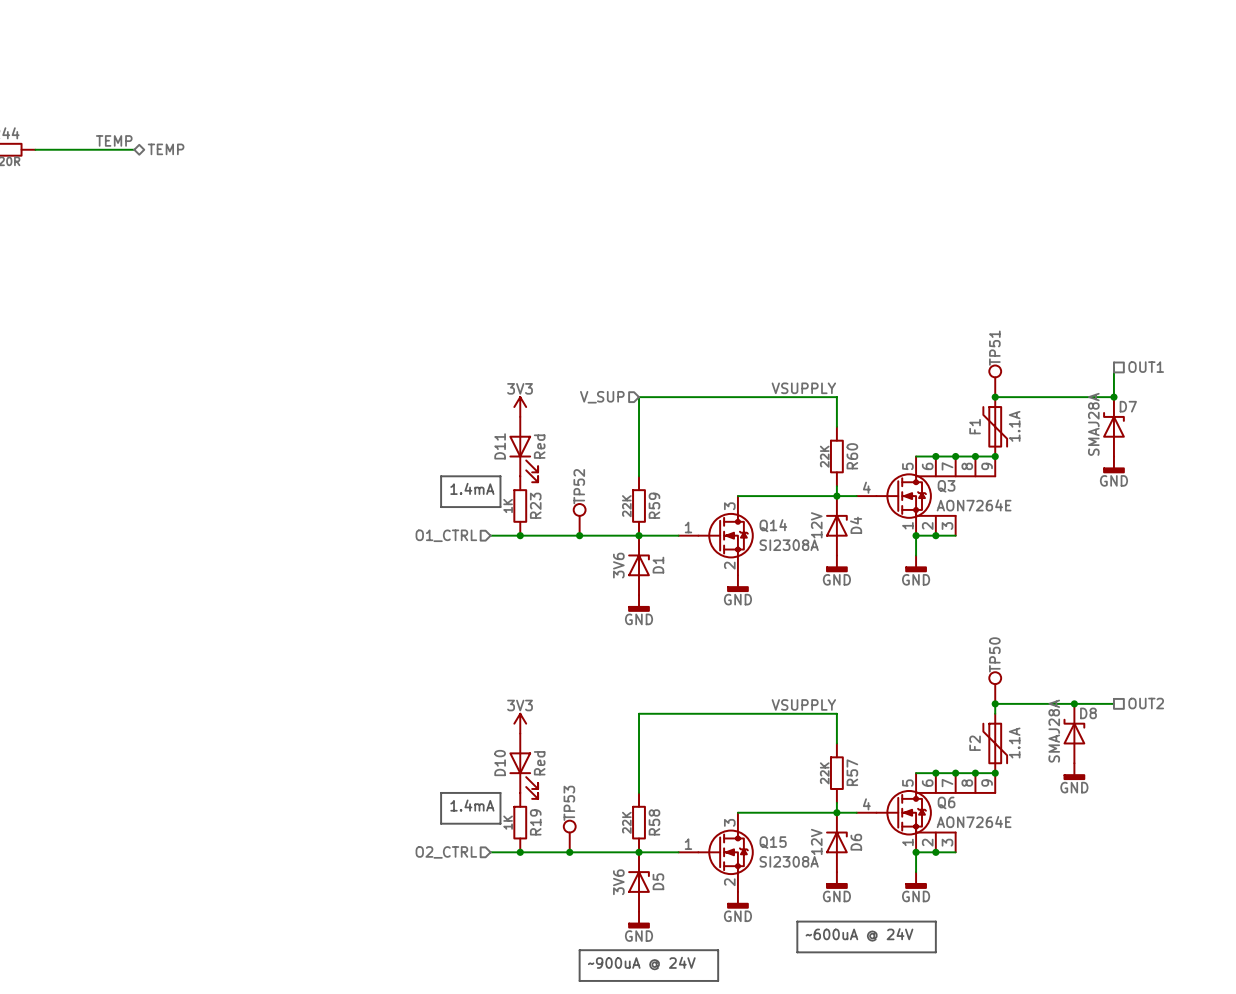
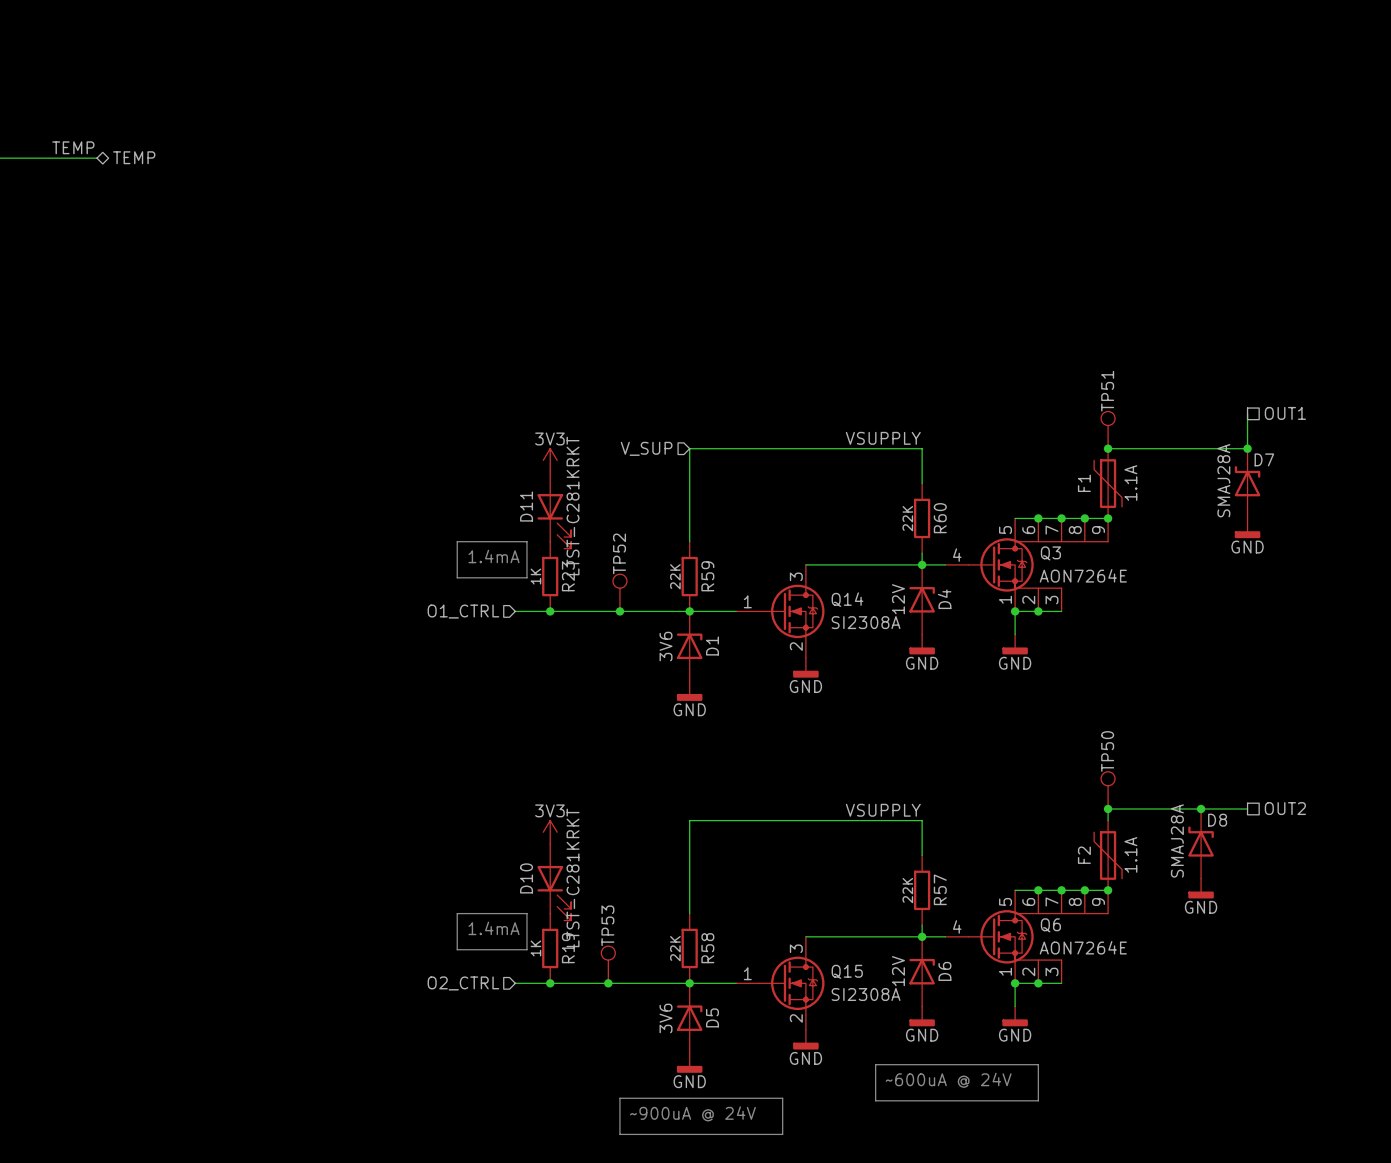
D11 value: none -> LTST-C281KRKT (573, 505)
D11 text: Red (539, 446) -> none
D10 value: none -> LTST-C281KRKT (573, 877)
D10 text: Red (539, 763) -> none

